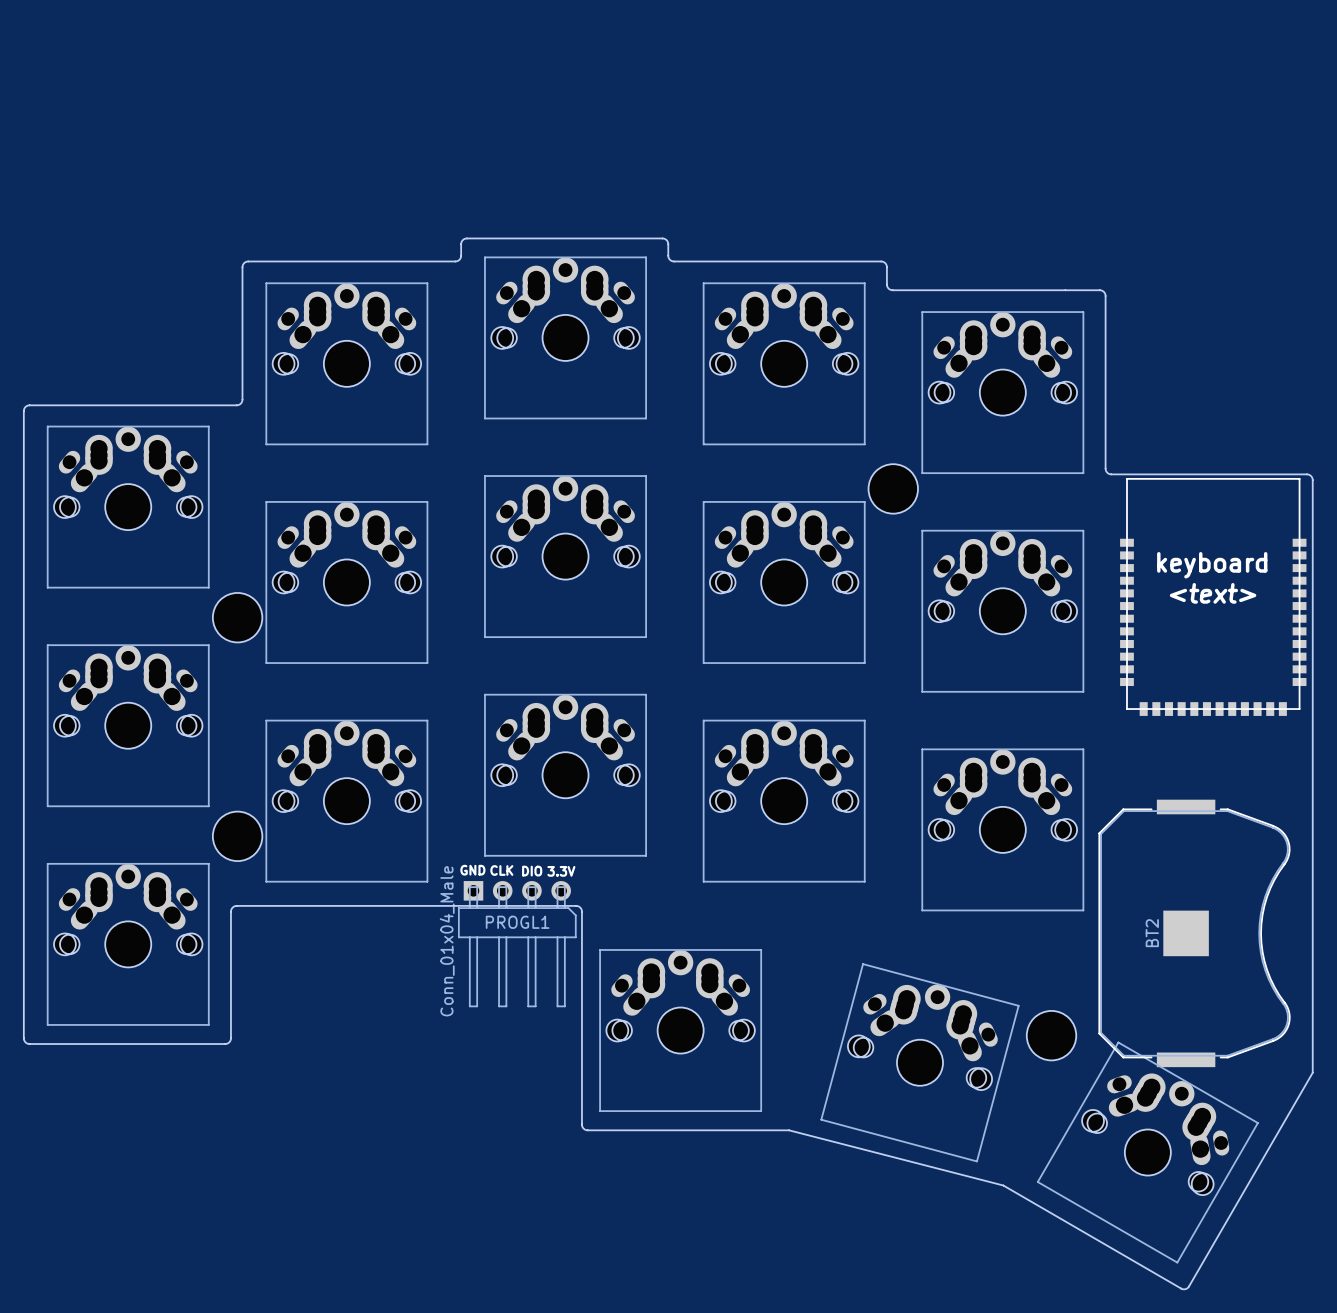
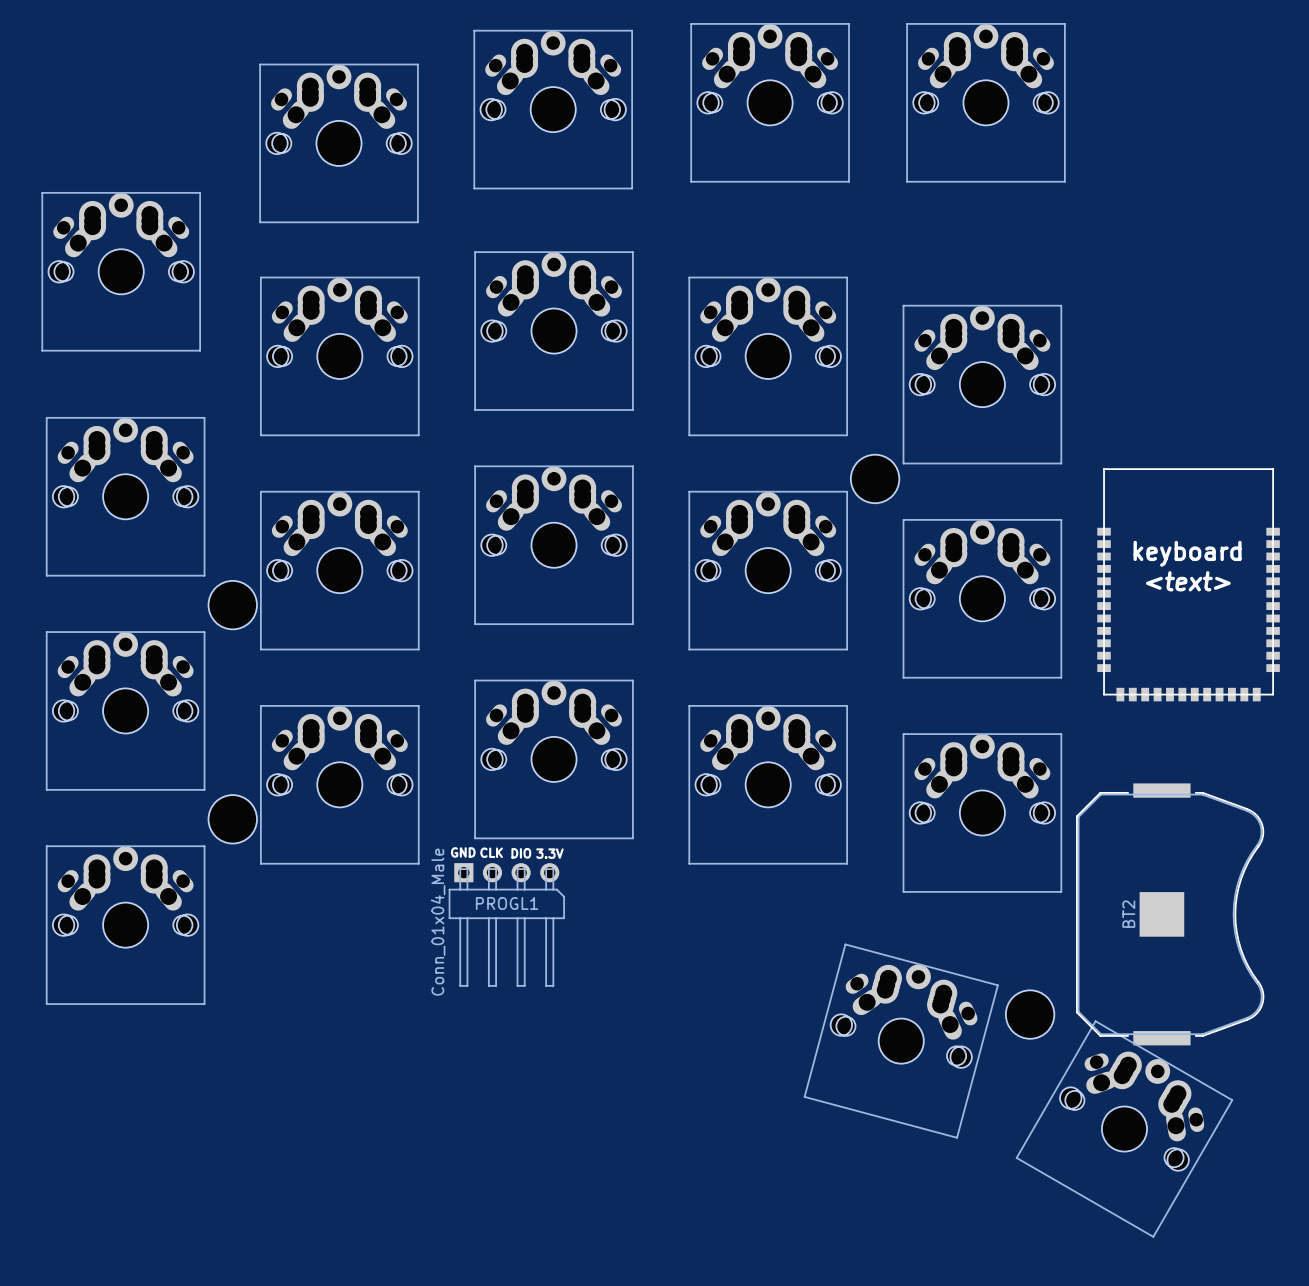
part: none -> (770, 102)
part: none -> (985, 102)
part: none -> (553, 109)
part: none -> (339, 143)
board edge: (466, 238) (663, 238) (668, 242) (668, 257) (674, 261) (881, 261) (886, 265) (887, 285) (891, 290) (1101, 290) (1105, 296) (1105, 468) (1107, 472) (1111, 474) (1306, 474) (1311, 476) (1312, 1072) (1187, 1288) (1181, 1288) (1003, 1185) (789, 1130) (584, 1129) (581, 1124) (581, 911) (577, 906) (235, 906) (230, 911) (230, 1038) (228, 1043) (29, 1044) (25, 1041) (24, 408) (29, 405) (238, 404) (242, 399) (242, 267) (244, 262) (456, 261) (460, 257) (461, 242) (466, 238) -> none
part: none -> (121, 271)
part: (680, 1030) -> none

